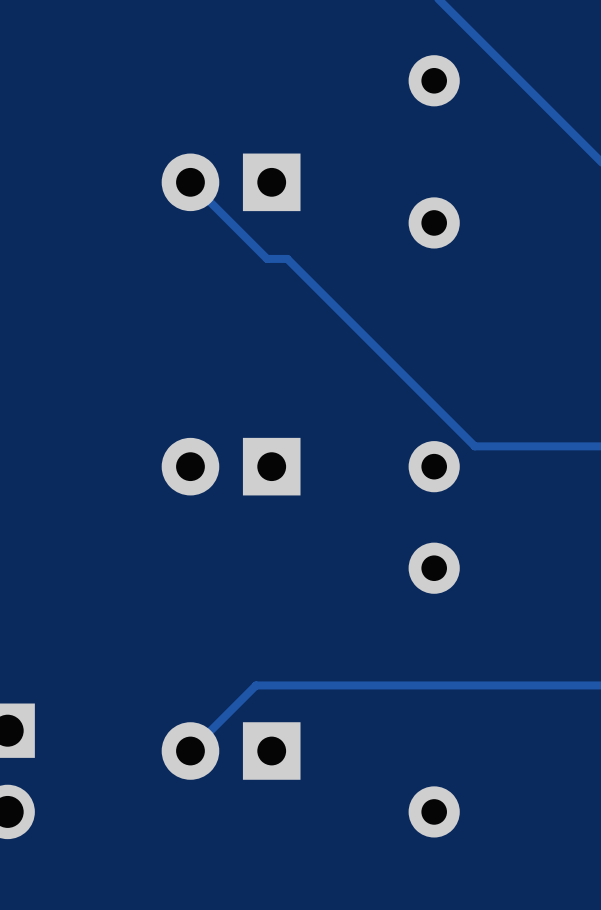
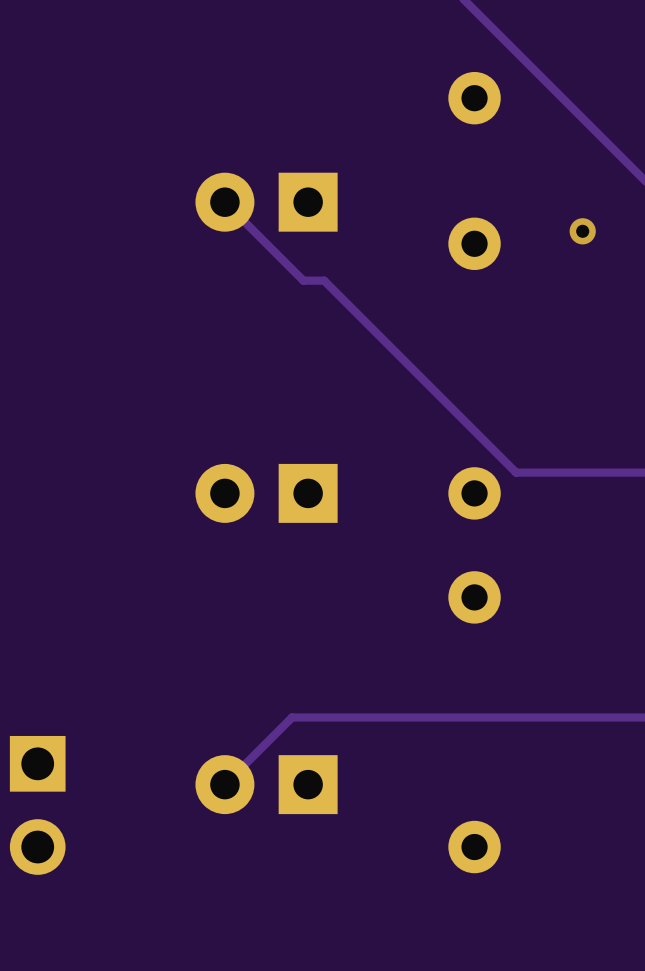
via: none -> (582, 231)

